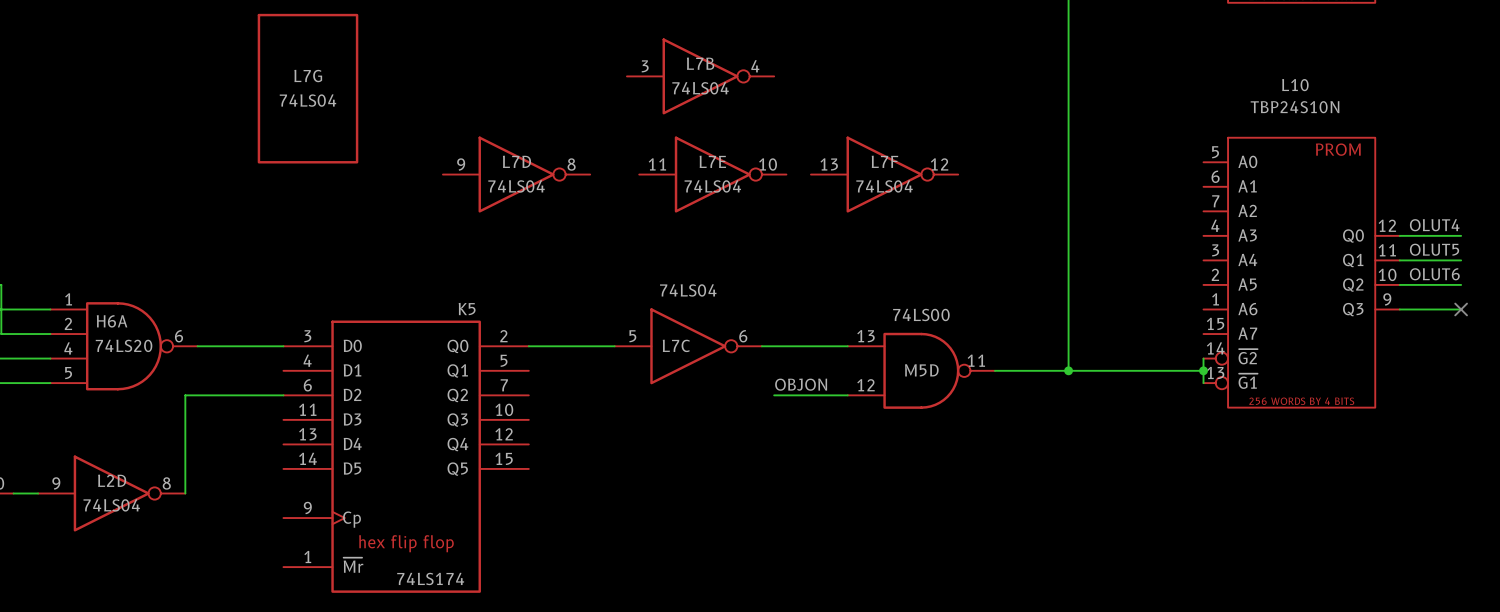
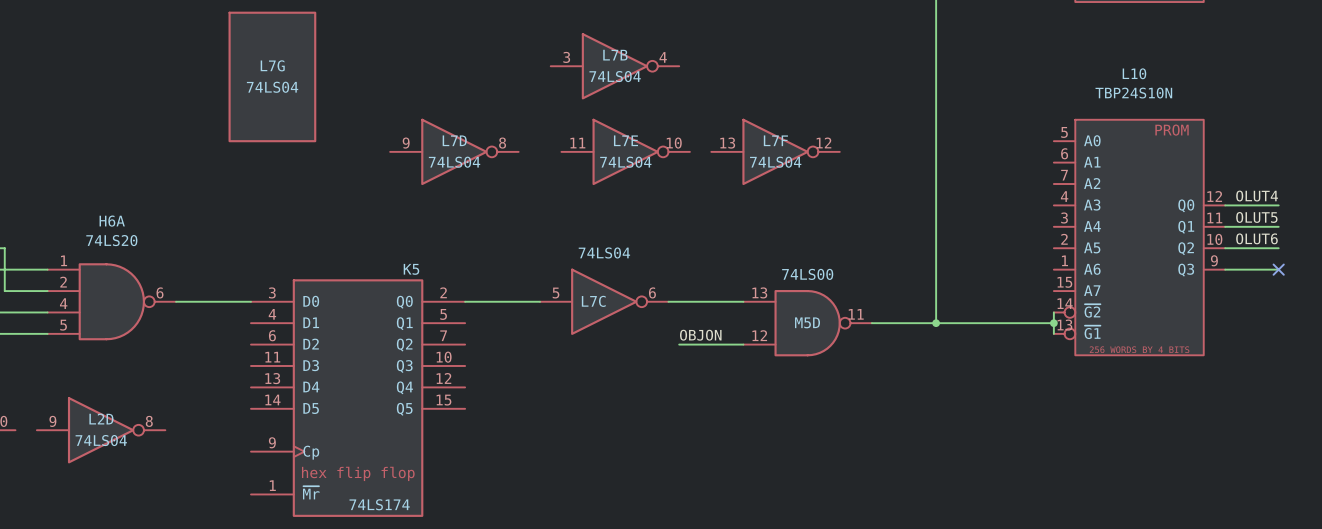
H6A name position: H6A (112, 321) -> H6A (112, 221)
H6A value position: 74LS20 (124, 345) -> 74LS20 (111, 240)
wire: (283, 395) (185, 395) (185, 493) -> none
wire: (13, 493) (38, 493) -> none

